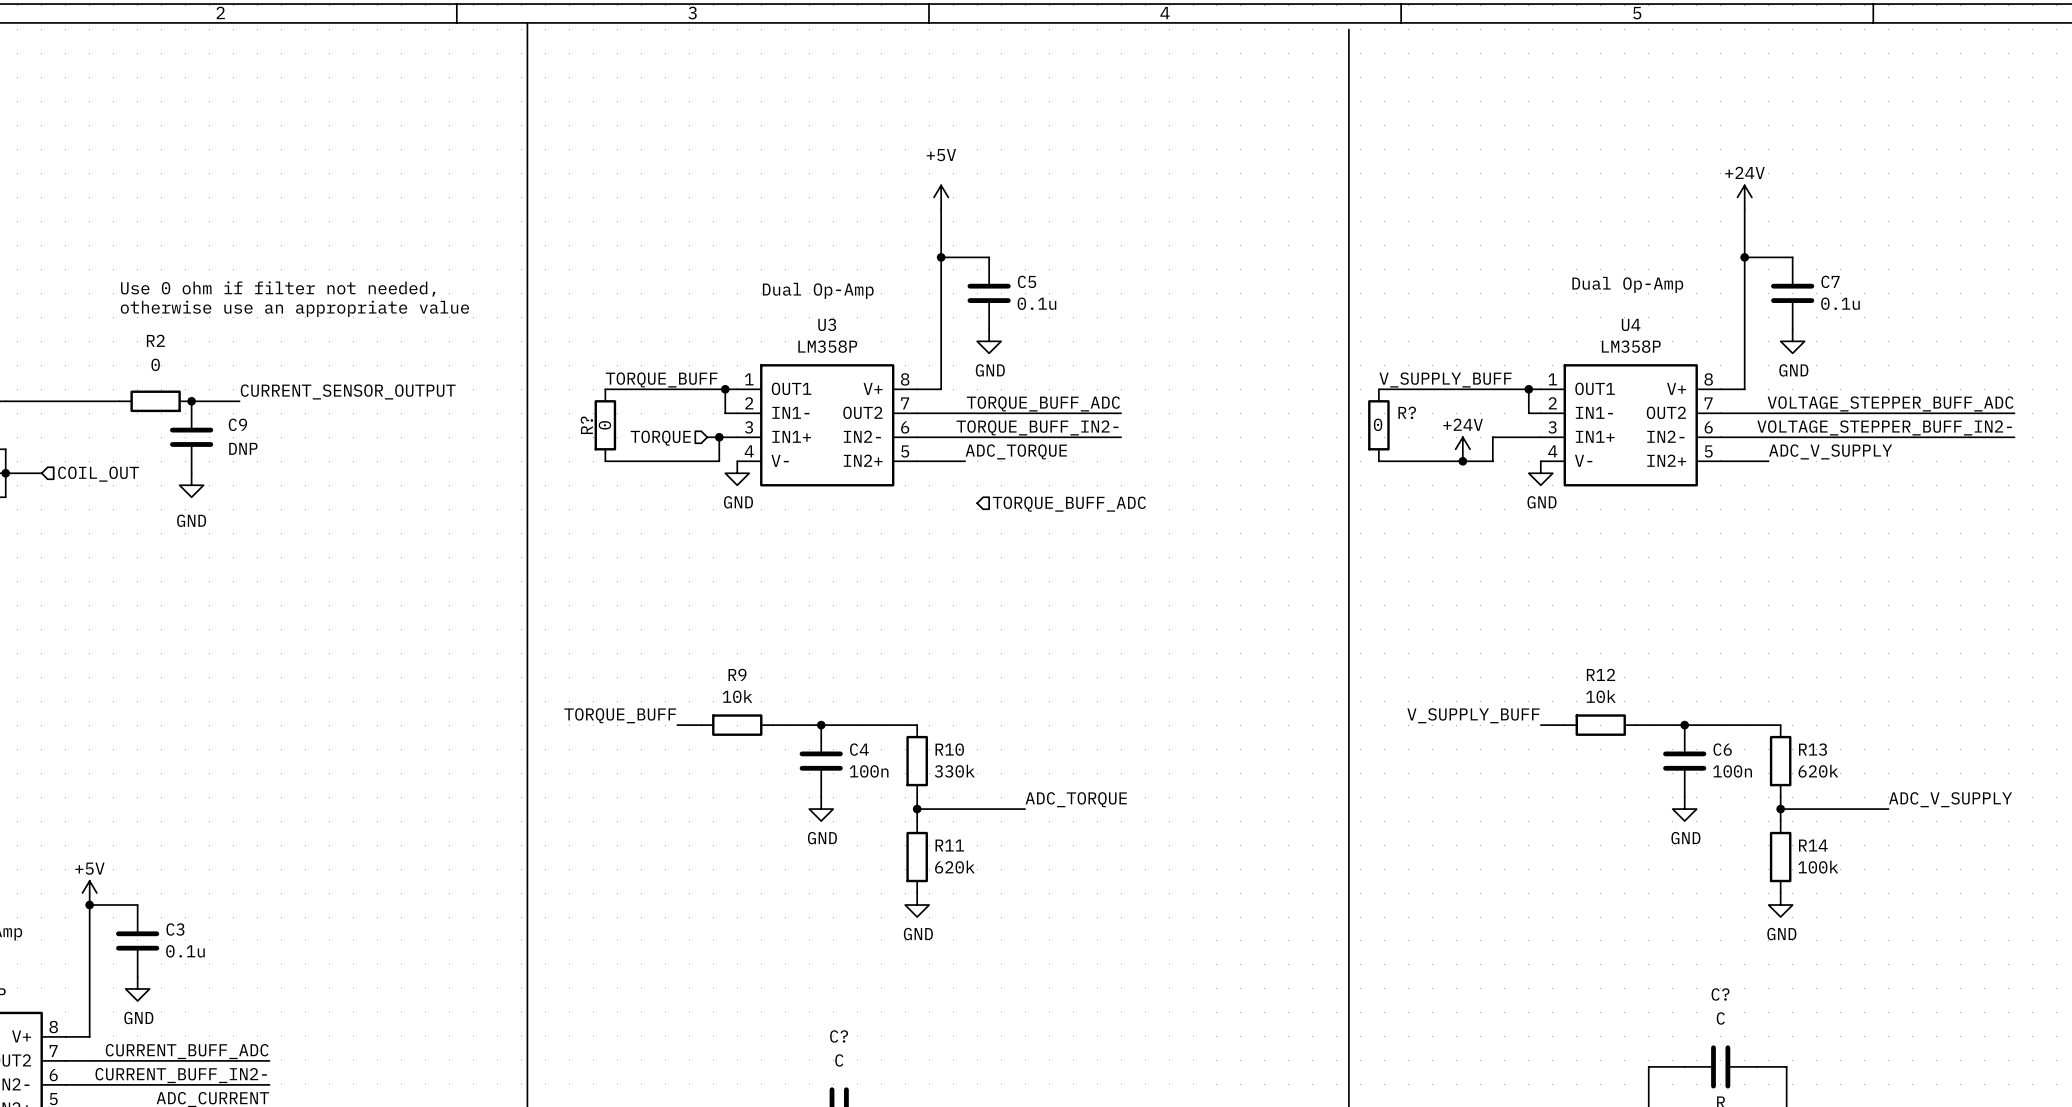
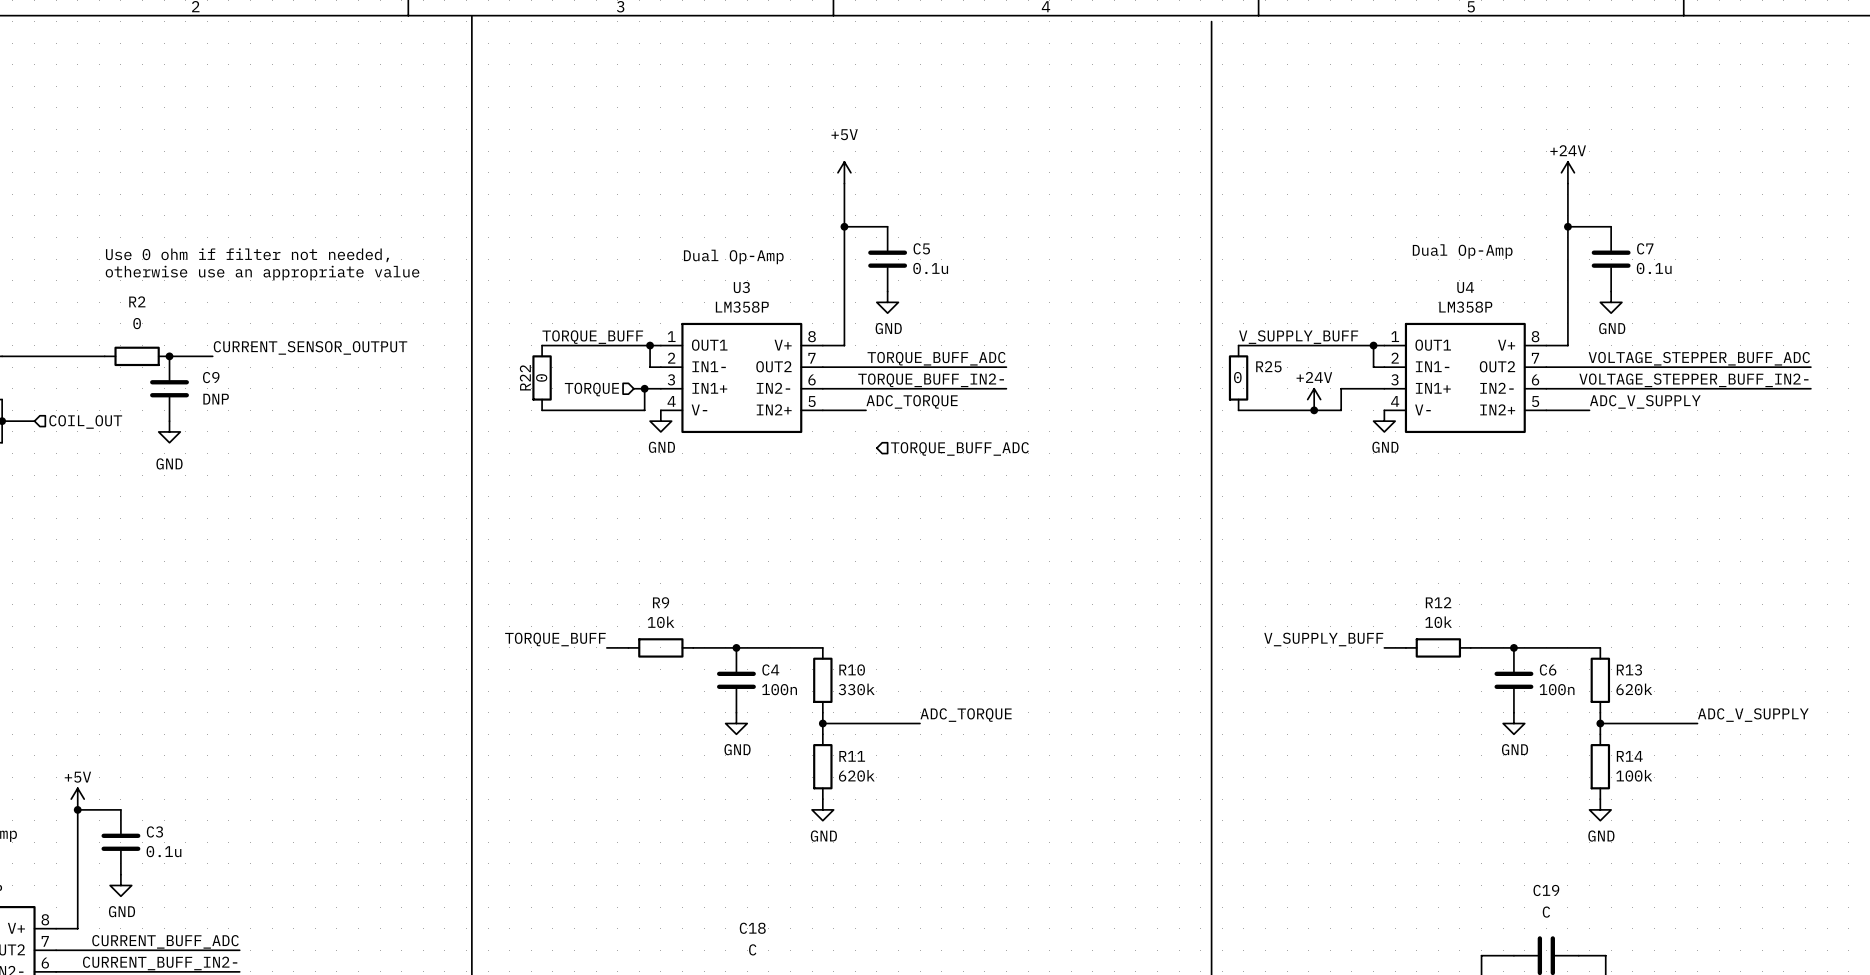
R? name: R? (1407, 412) -> R25 (1268, 366)
R? name: R? (586, 425) -> R22 (525, 377)
C? name: C? (1720, 994) -> C19 (1546, 890)
C? name: C? (839, 1036) -> C18 (752, 928)

